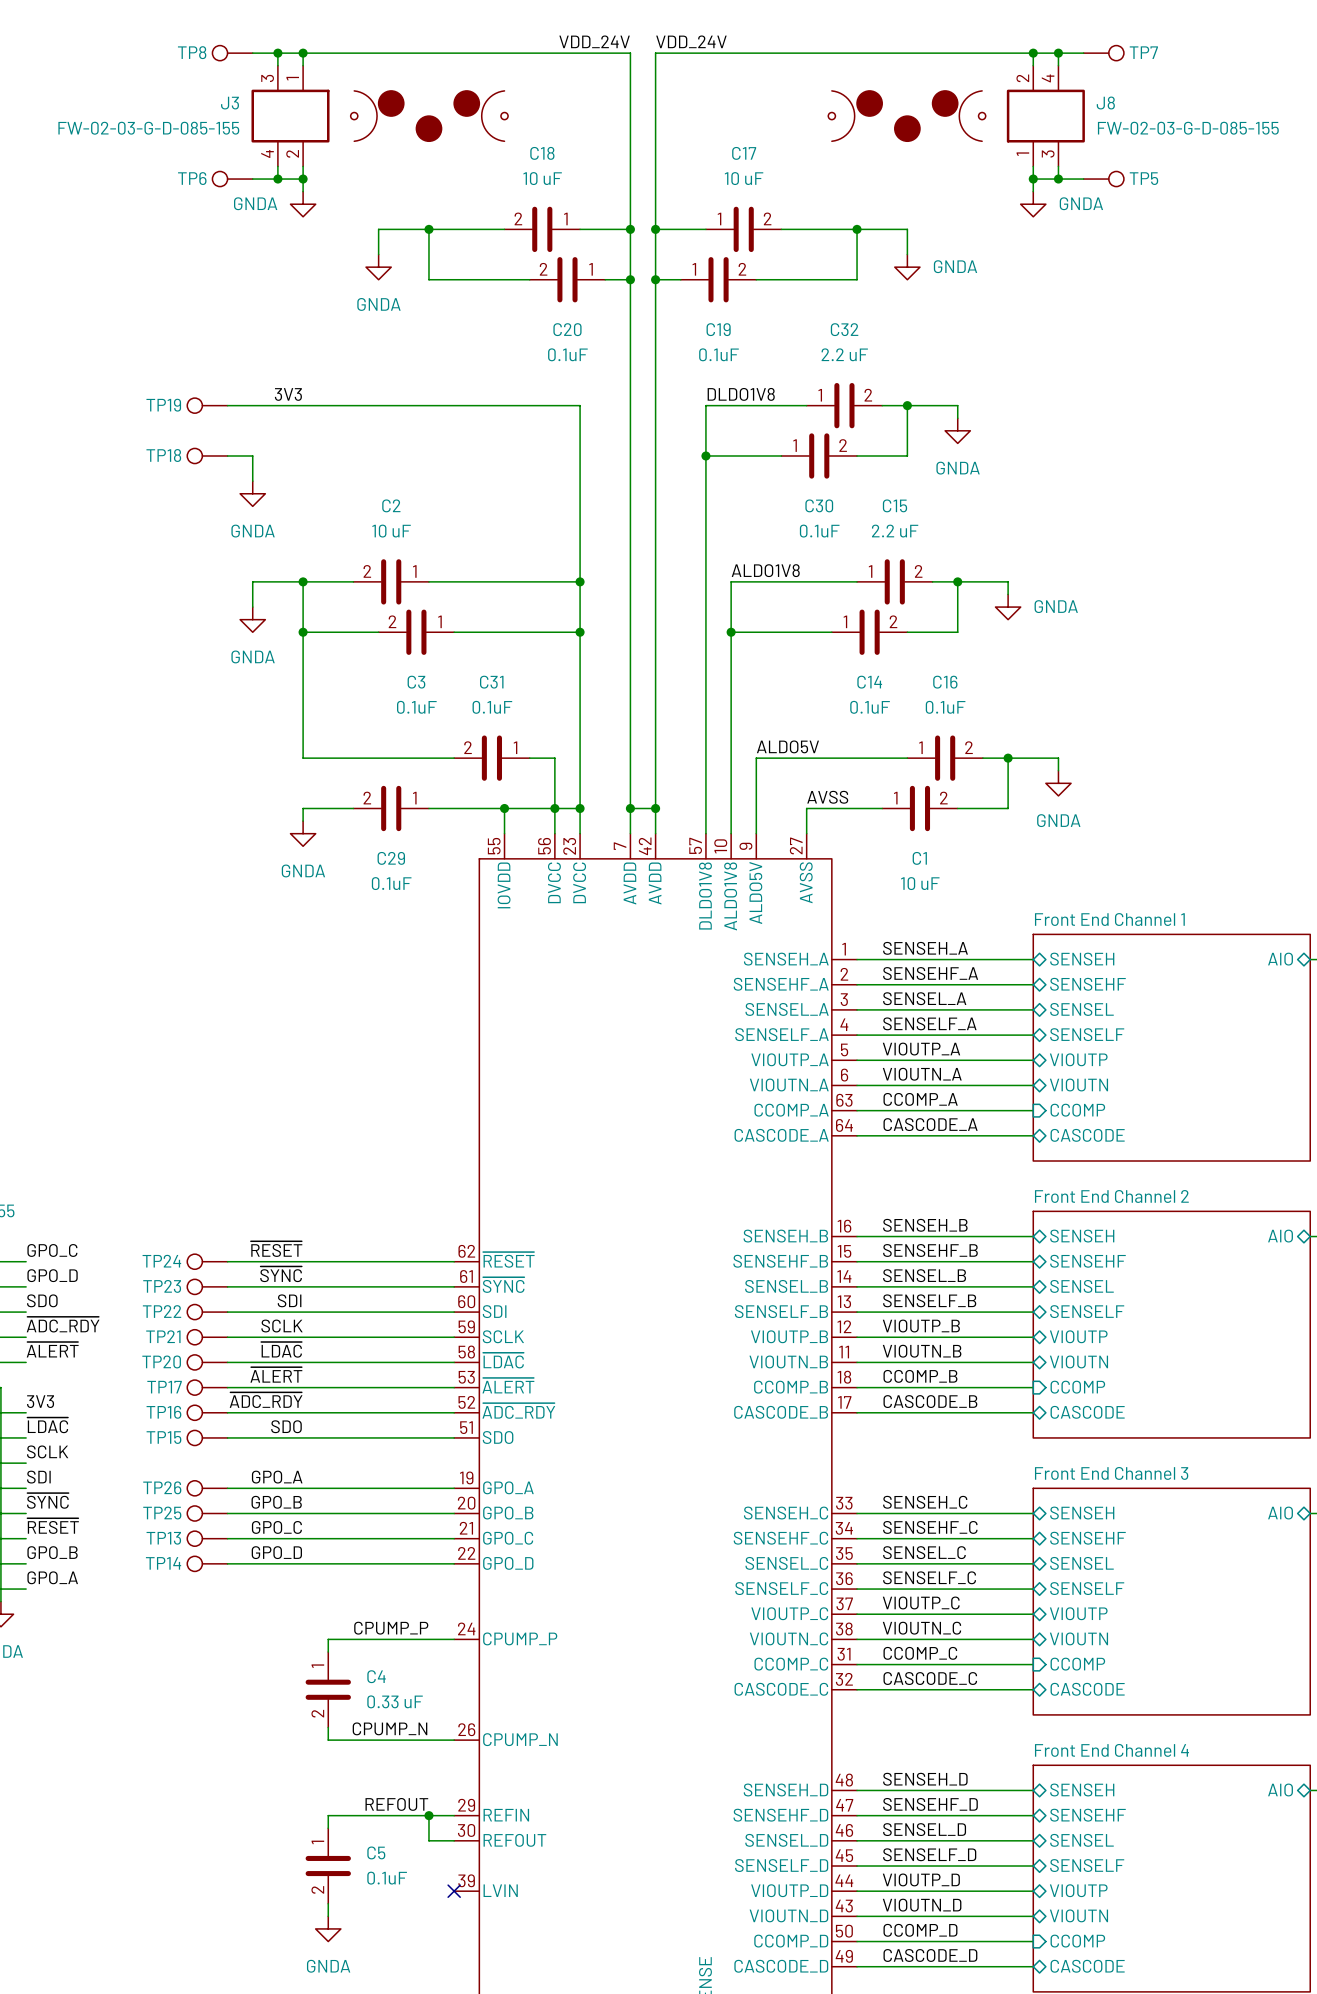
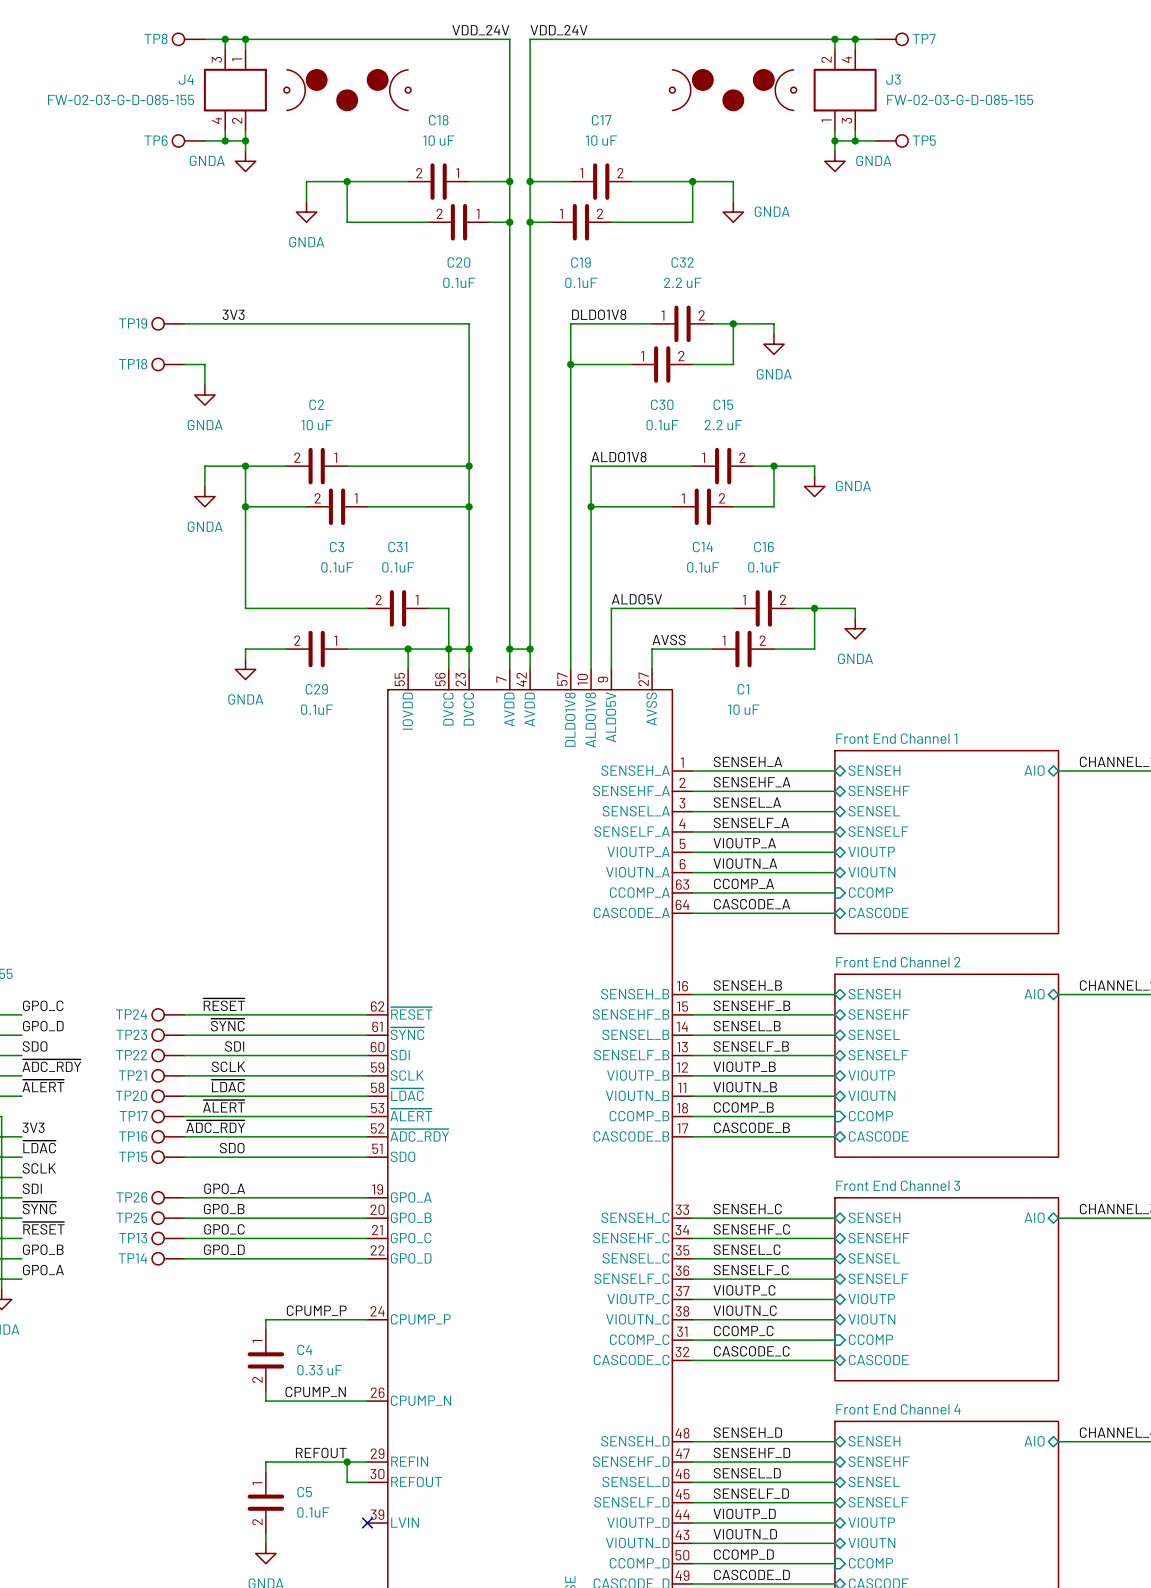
J3 name: J3 (230, 103) -> J4 (186, 79)
J8 name: J8 (1105, 103) -> J3 (893, 79)

